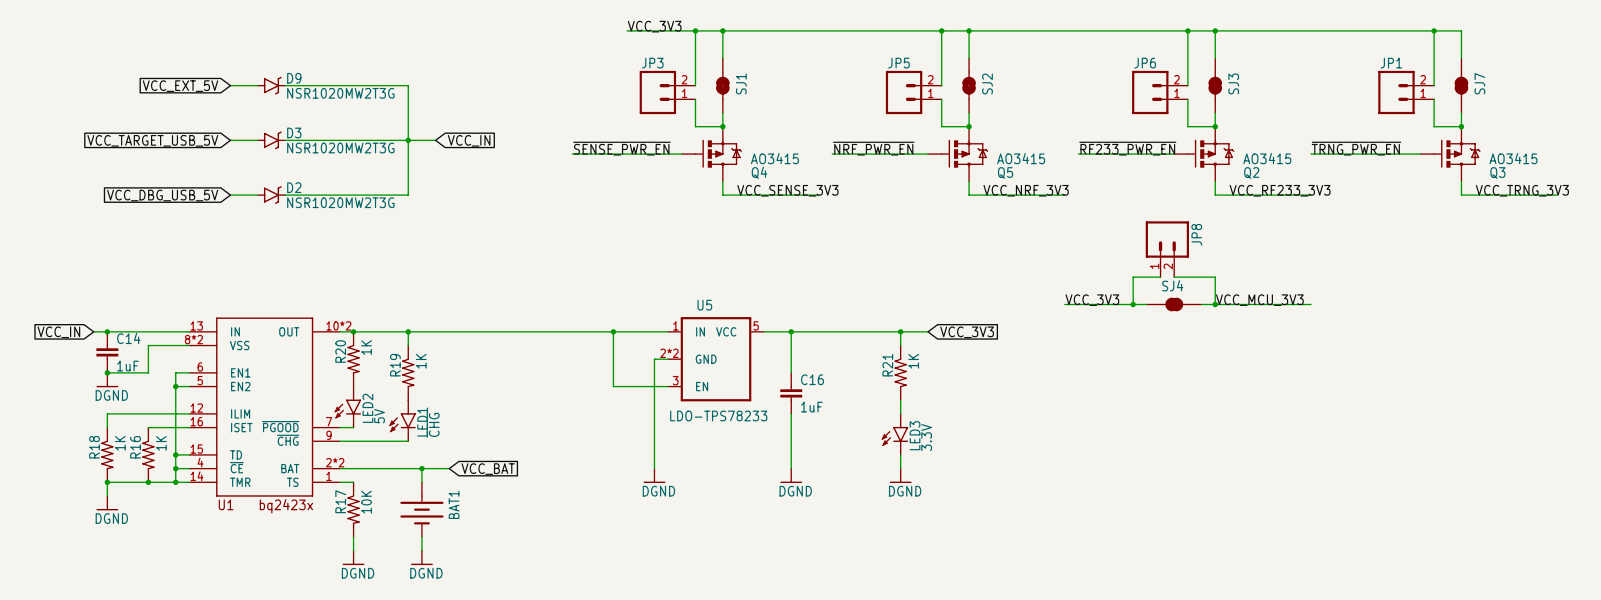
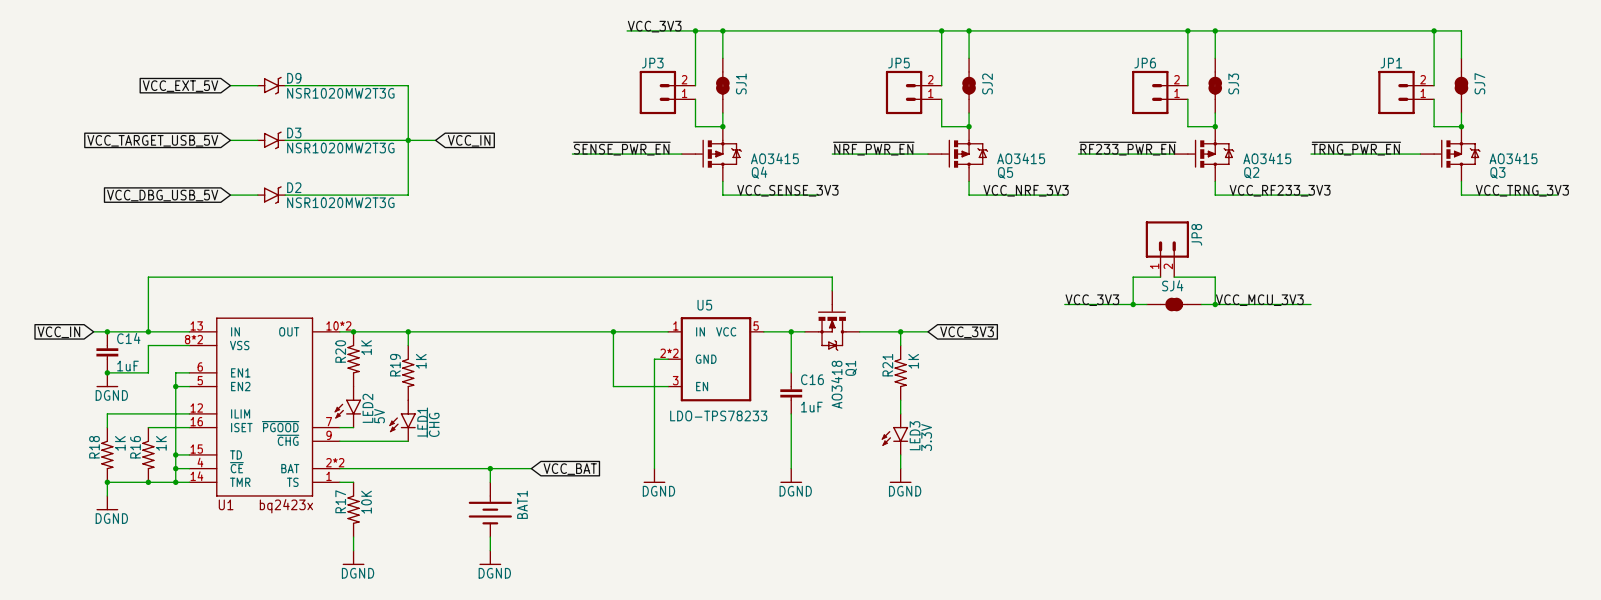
wire: none -> (832, 290) (832, 277) (148, 277) (148, 331)
Q1: none -> AO3418 (832, 320)
junction: none -> (148, 331)
wire: (421, 468) (421, 482) -> (490, 468) (490, 482)
junction: (421, 468) -> none
wire: none -> (449, 468) (531, 468)
junction: none -> (490, 468)
global label position: VCC_BAT (488, 469) -> VCC_BAT (570, 469)
BAT1 position: (421, 509) -> (490, 509)
wire: (421, 537) (421, 550) -> (490, 537) (490, 550)
power symbol position: DGND (421, 557) -> DGND (490, 557)

